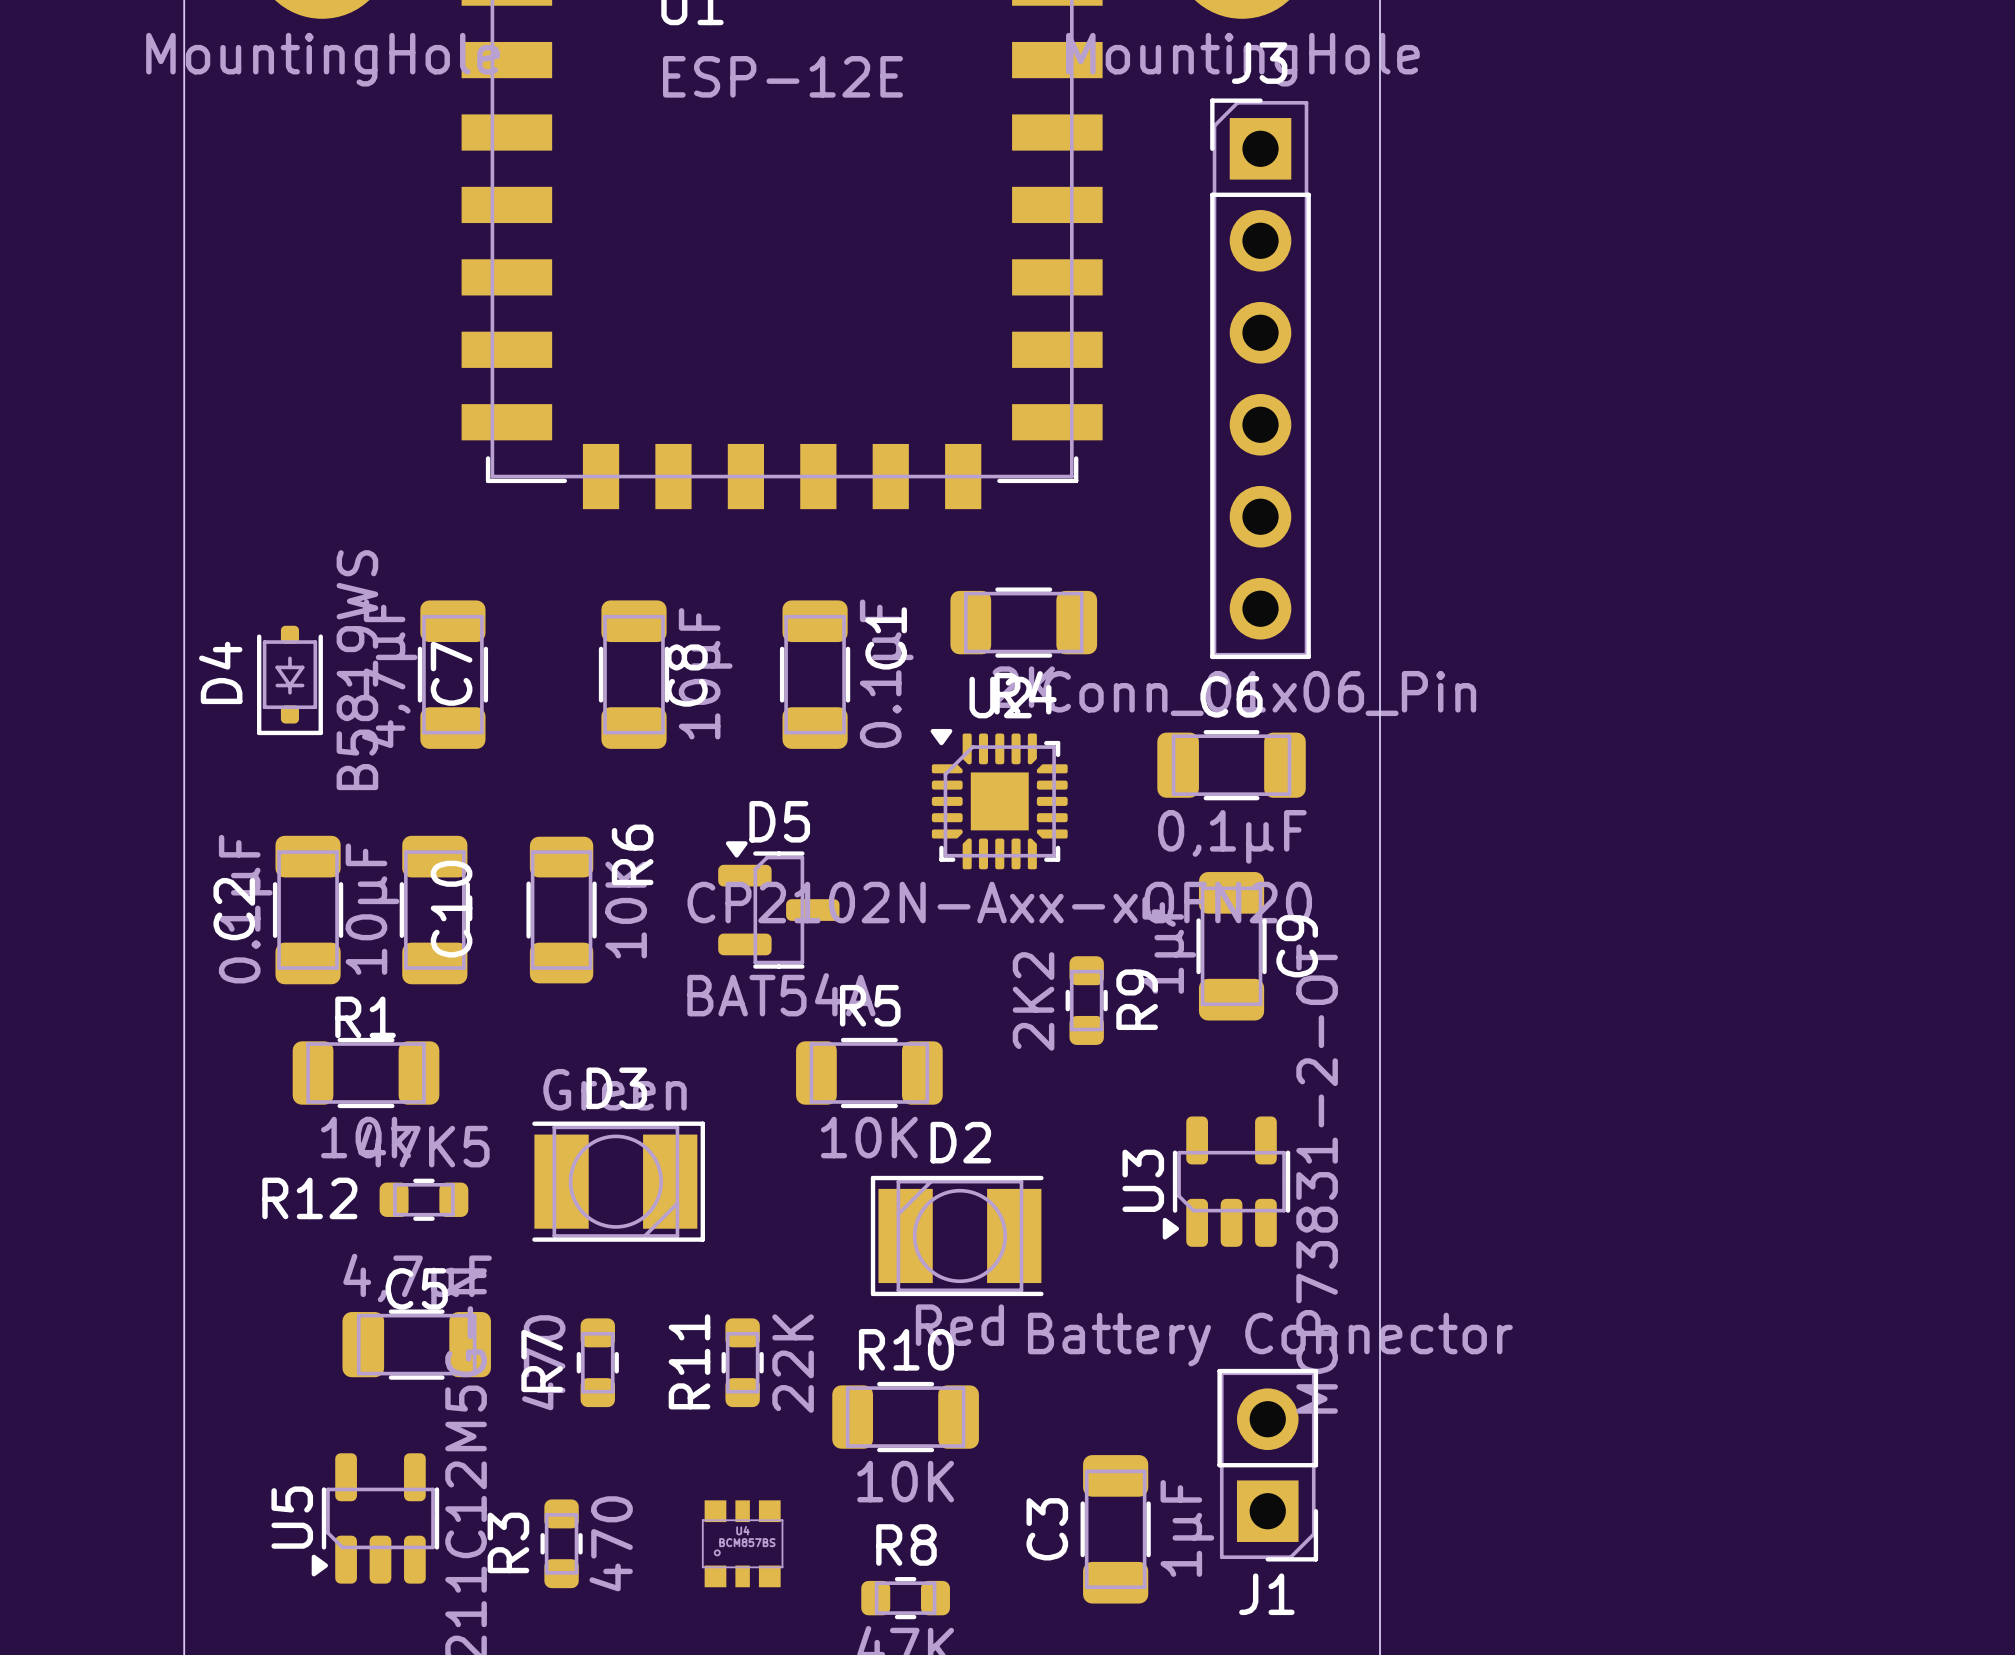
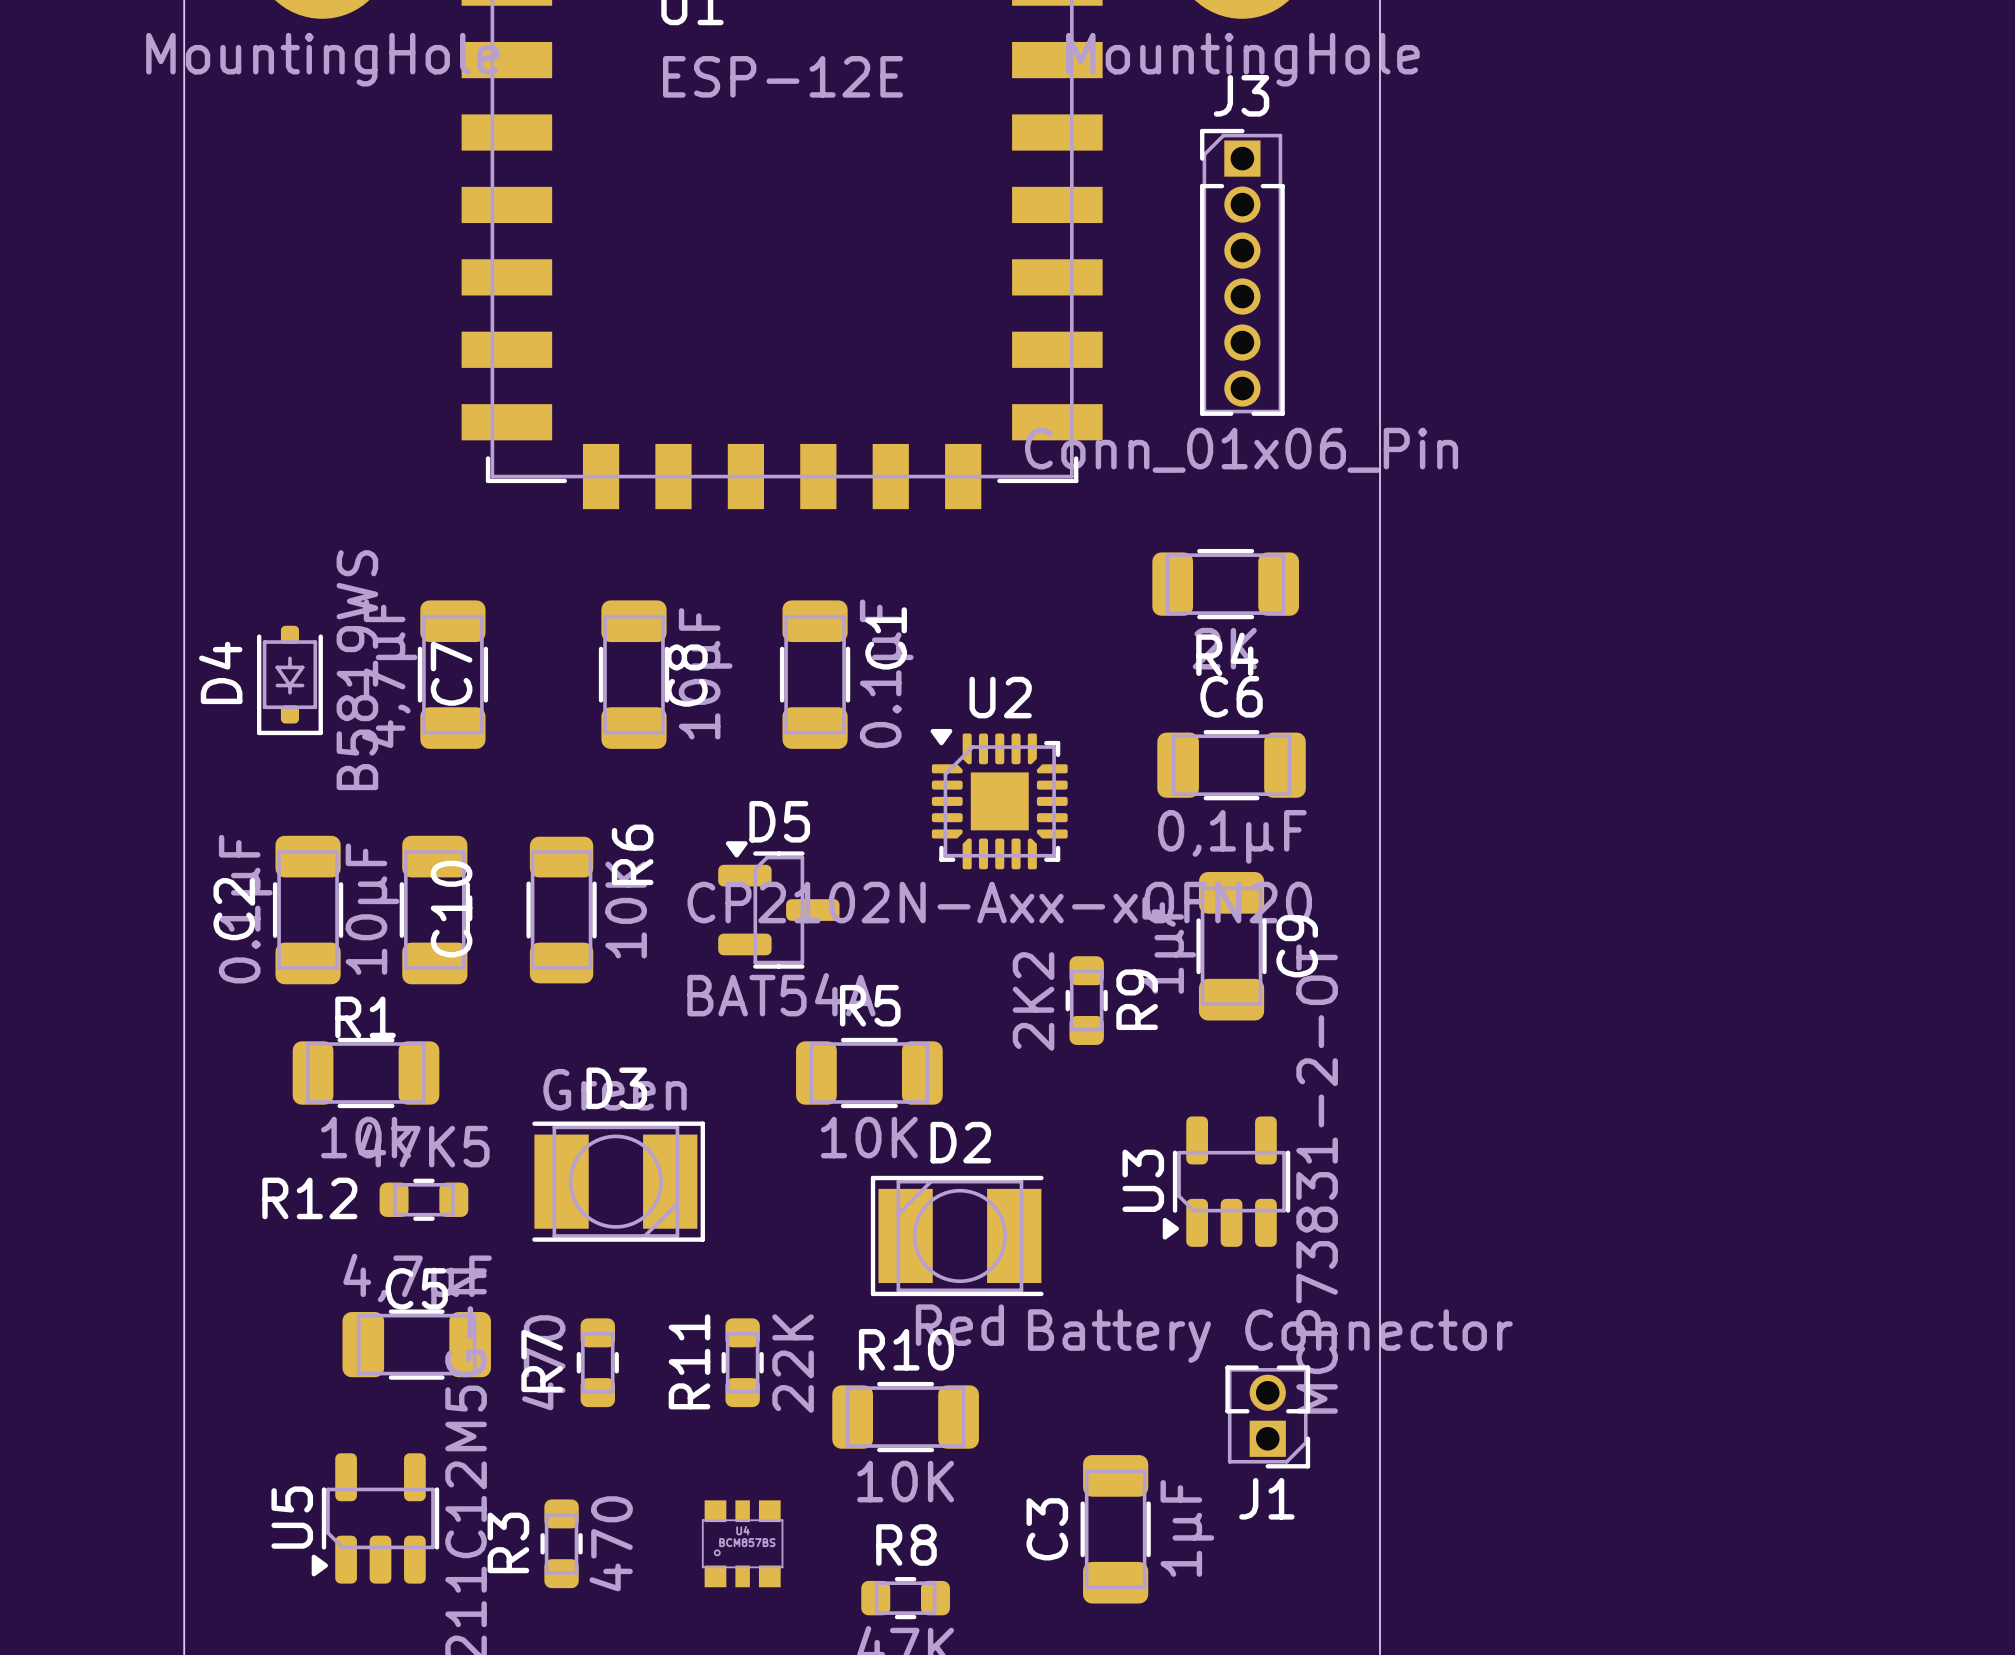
J3 name position: J3 (1259, 63) -> J3 (1241, 95)
J3 footprint: [1210, 98, 1311, 660] -> [1200, 128, 1285, 416]
R4 position: (1023, 622) -> (1225, 584)
J3 value position: Conn_01x06_Pin (1259, 693) -> Conn_01x06_Pin (1241, 450)
J1 footprint: [1217, 1368, 1319, 1562] -> [1225, 1365, 1311, 1469]

